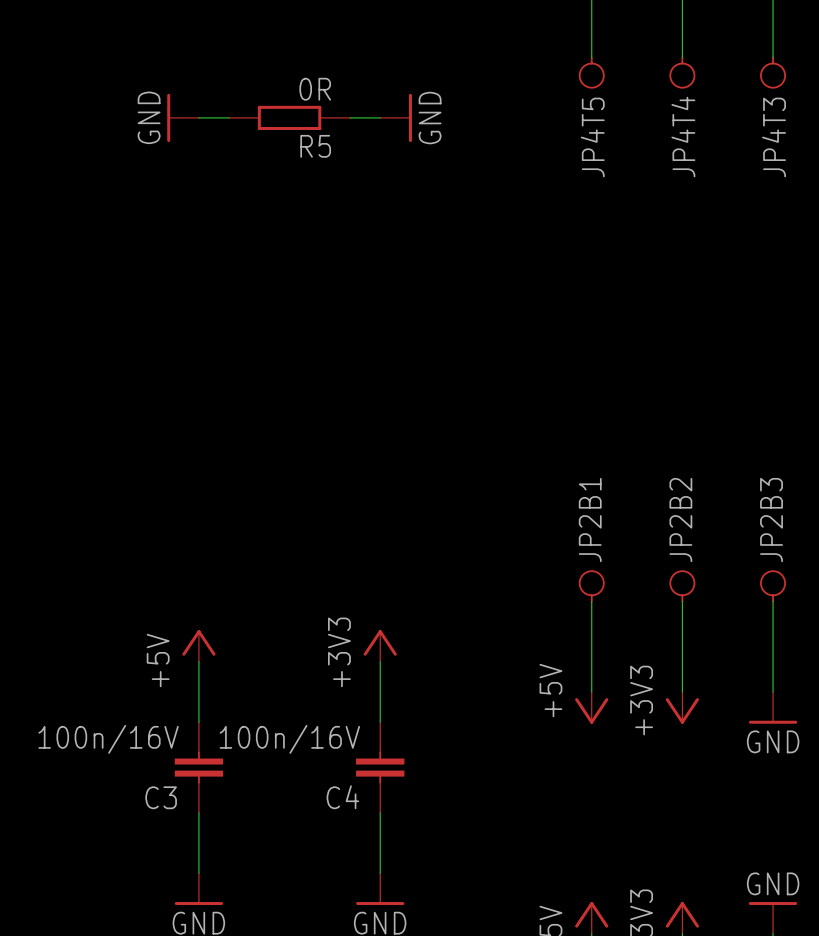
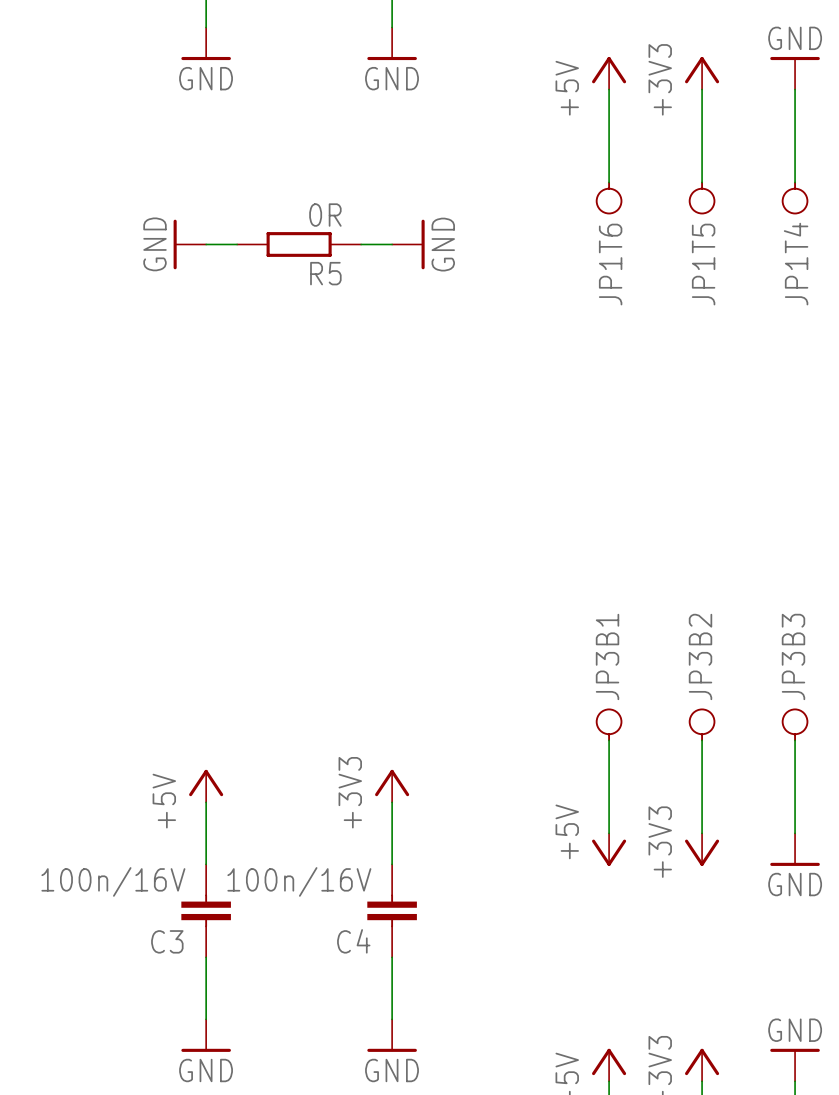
JP4T5 name: JP4T5 (592, 137) -> JP1T6 (610, 264)
JP4T4 name: JP4T4 (683, 137) -> JP1T5 (703, 264)
JP4T3 name: JP4T3 (774, 137) -> JP1T4 (796, 264)
JP2B1 name: JP2B1 (590, 520) -> JP3B1 (607, 656)
JP2B2 name: JP2B2 (680, 520) -> JP3B2 (700, 656)
JP2B3 name: JP2B3 (771, 520) -> JP3B3 (793, 656)

